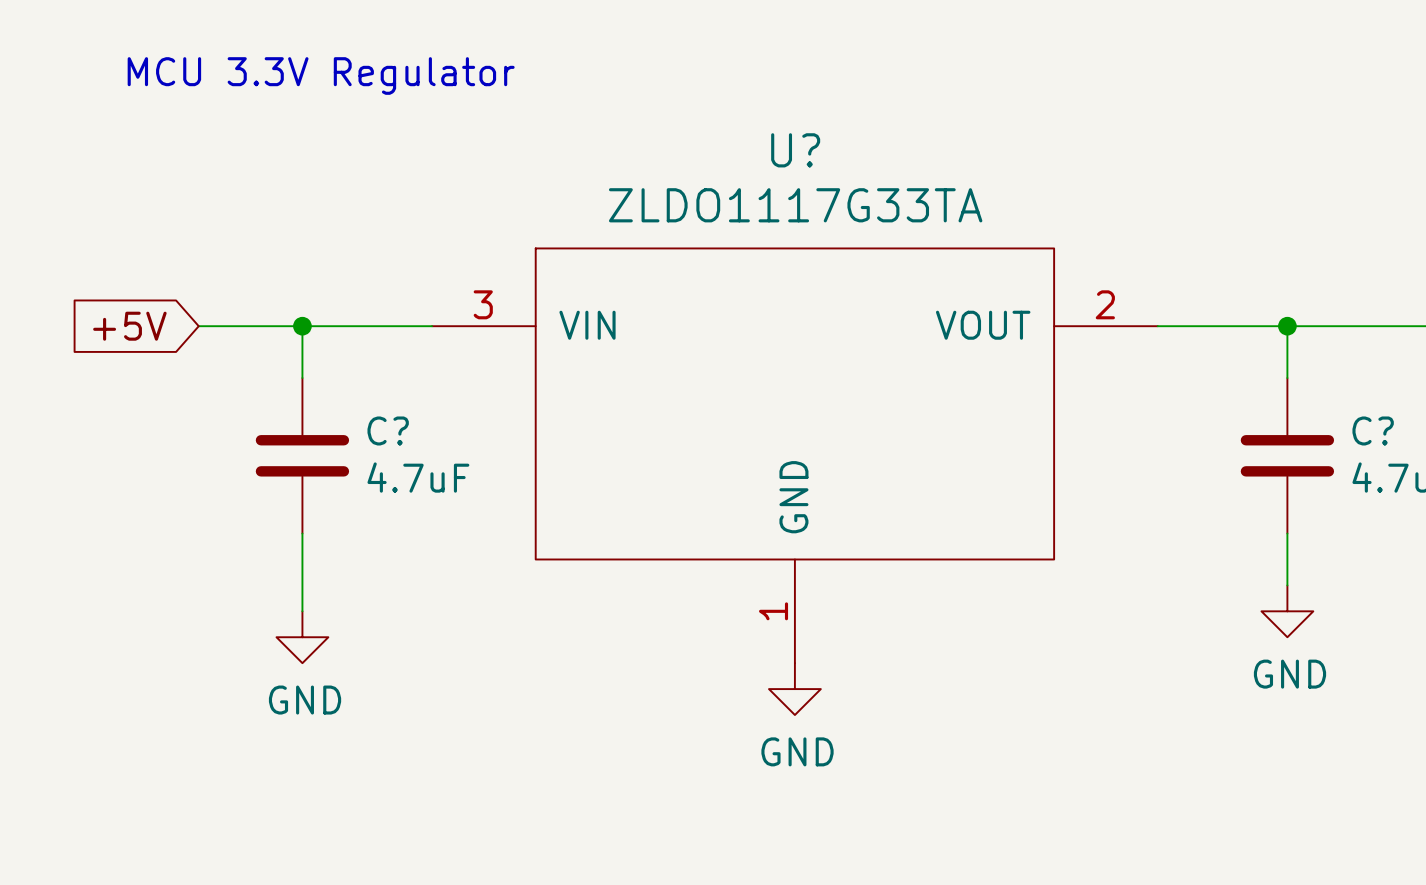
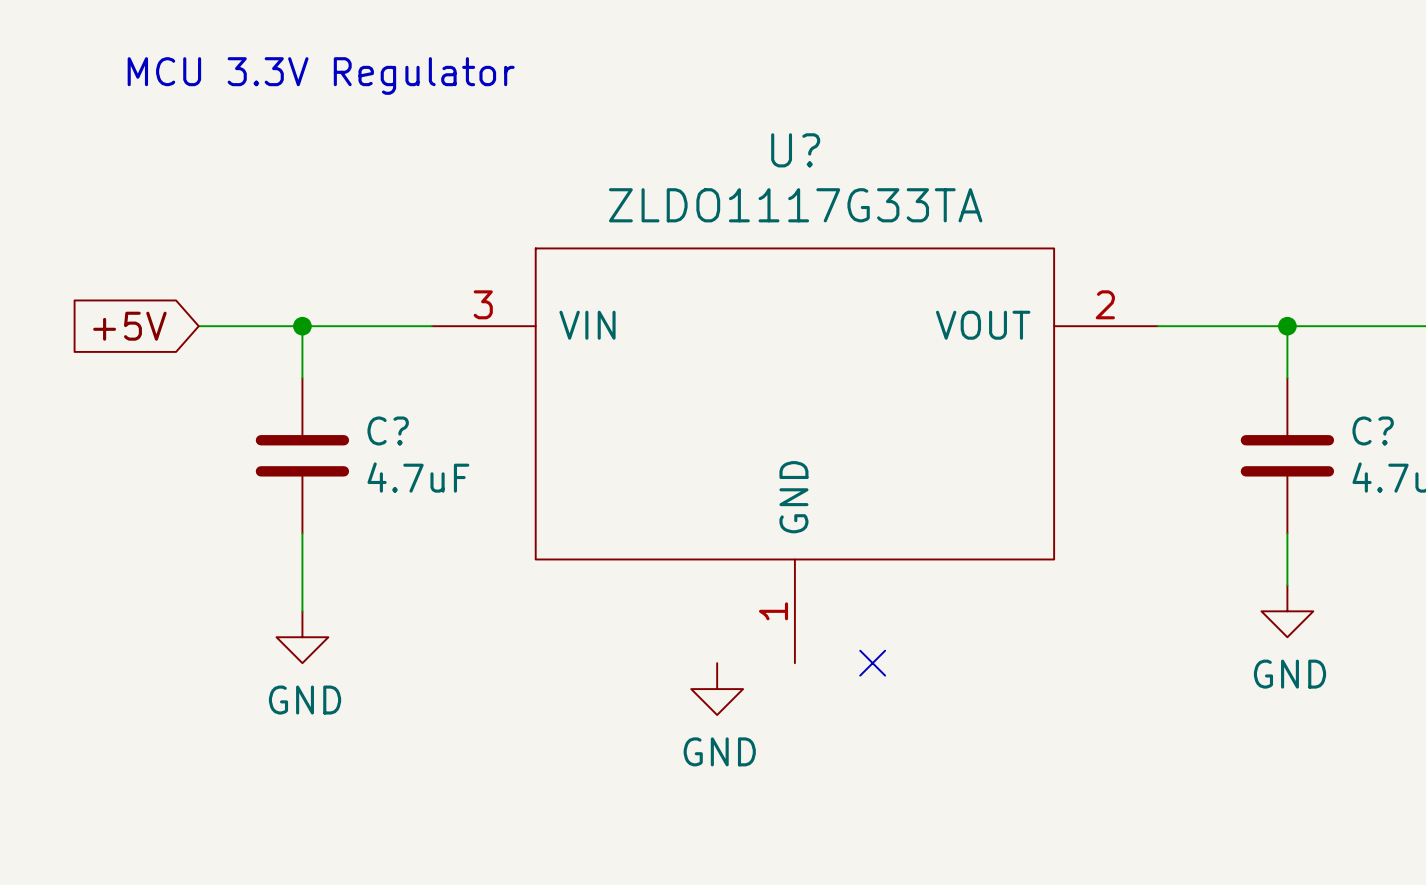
no-connect mark: none -> (872, 663)
power symbol position: GND (794, 689) -> GND (717, 689)

